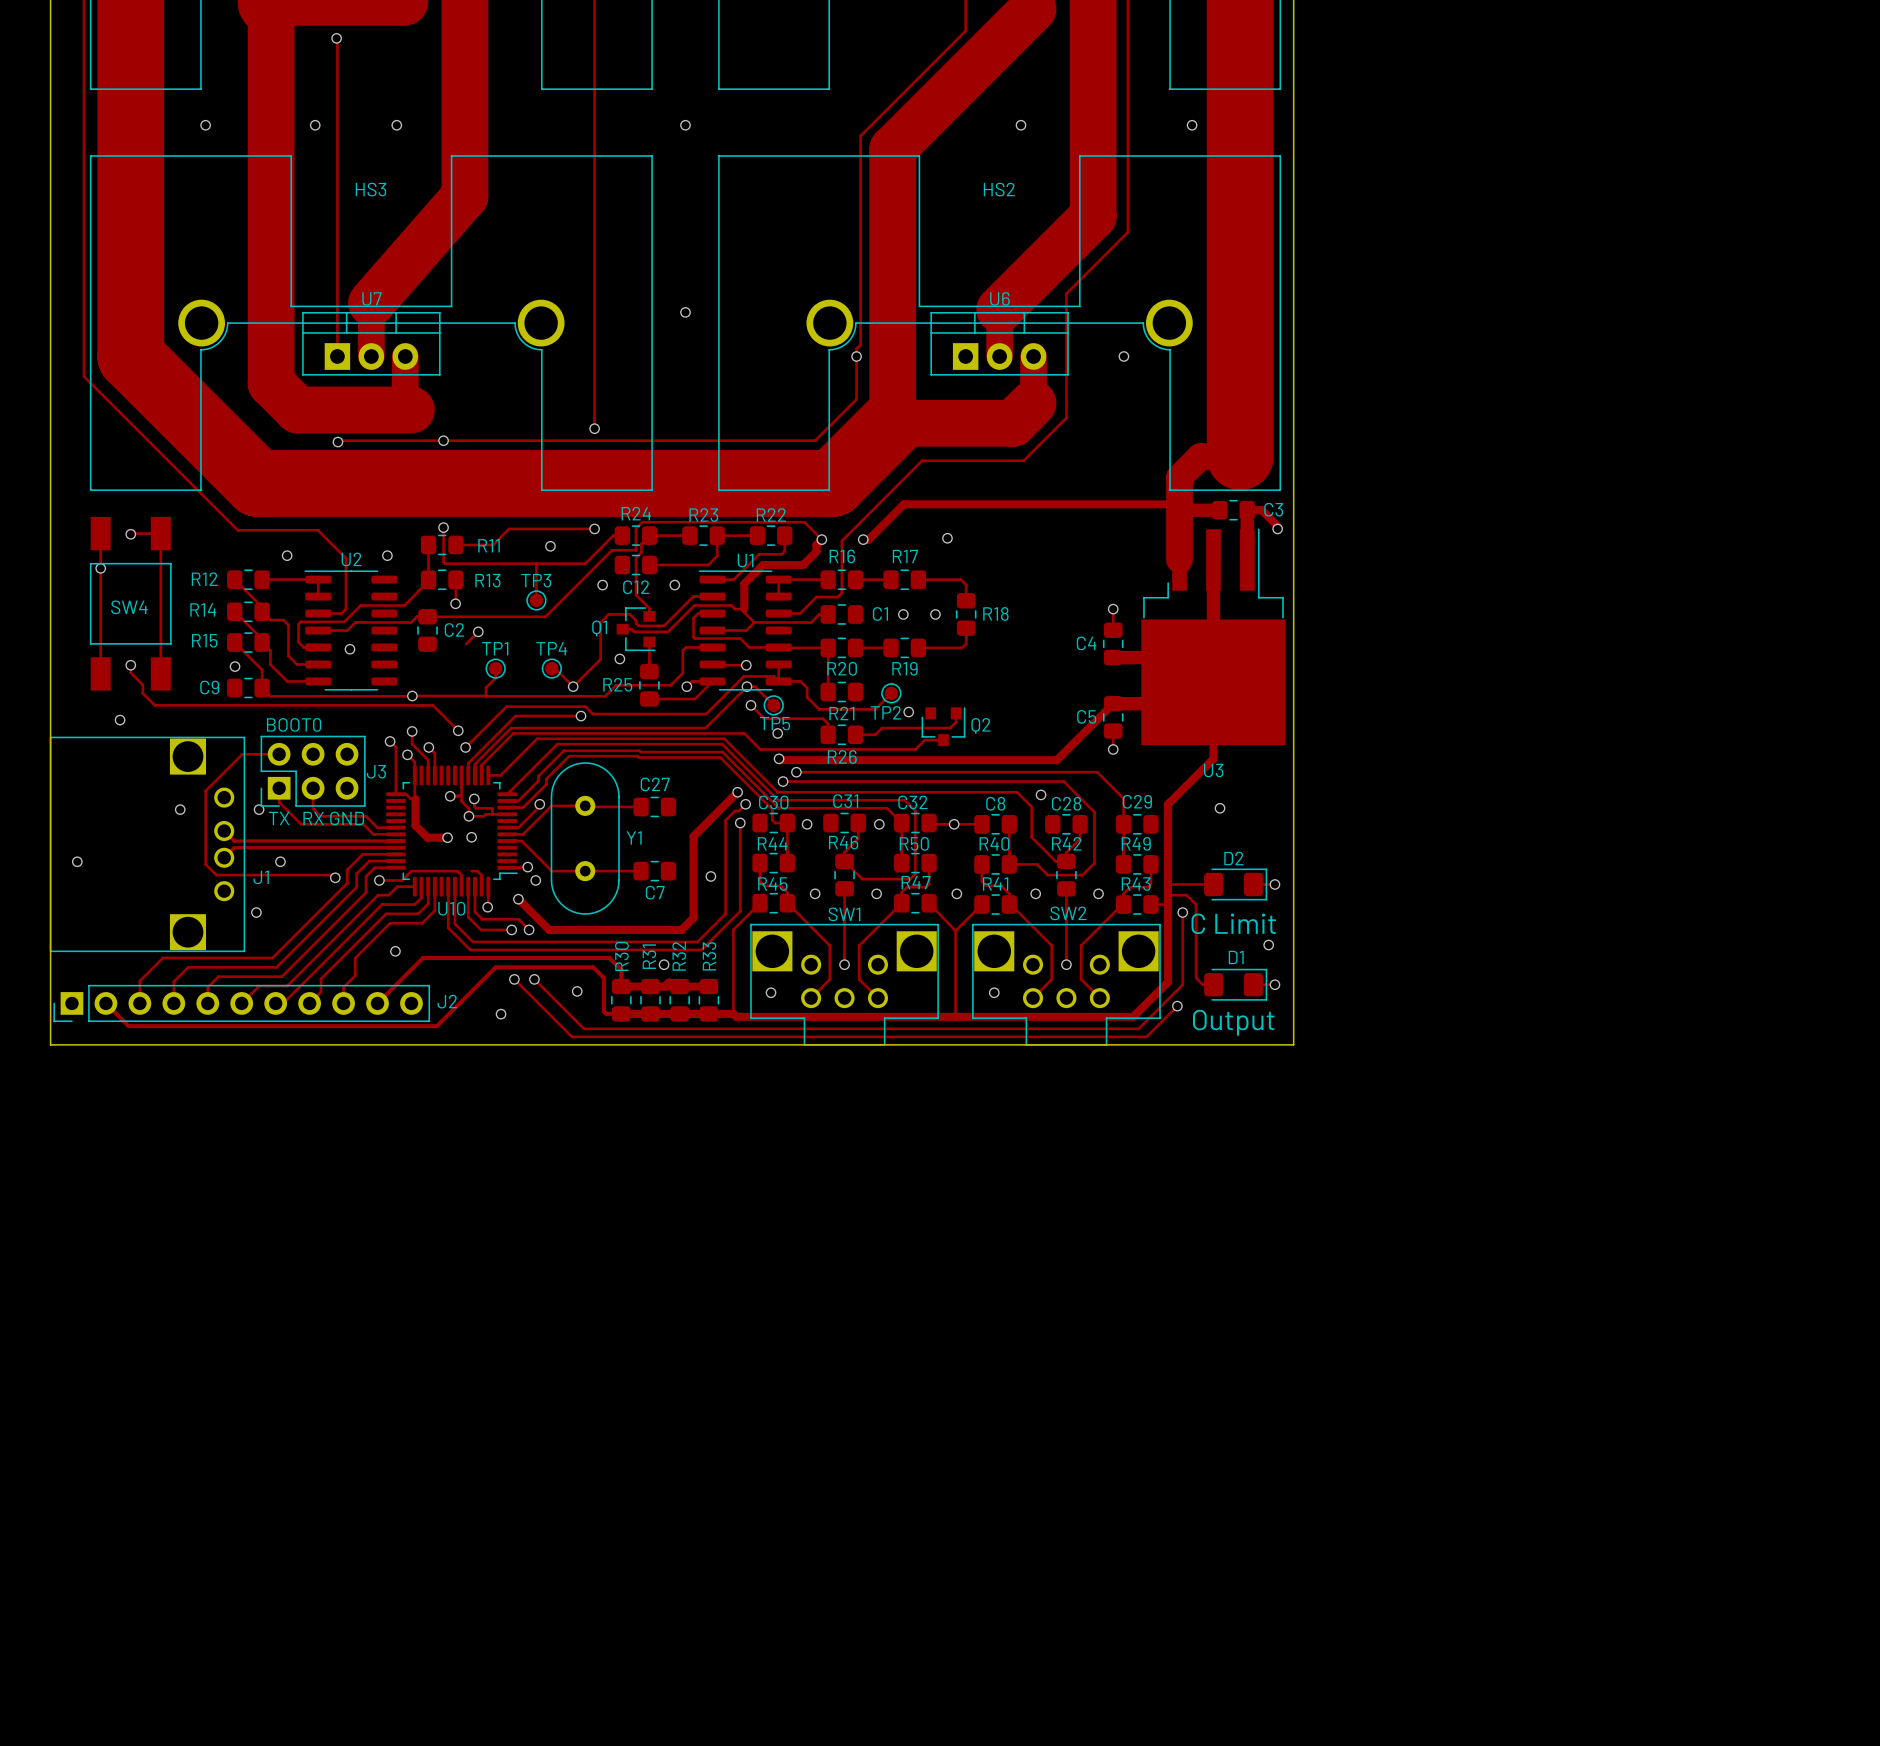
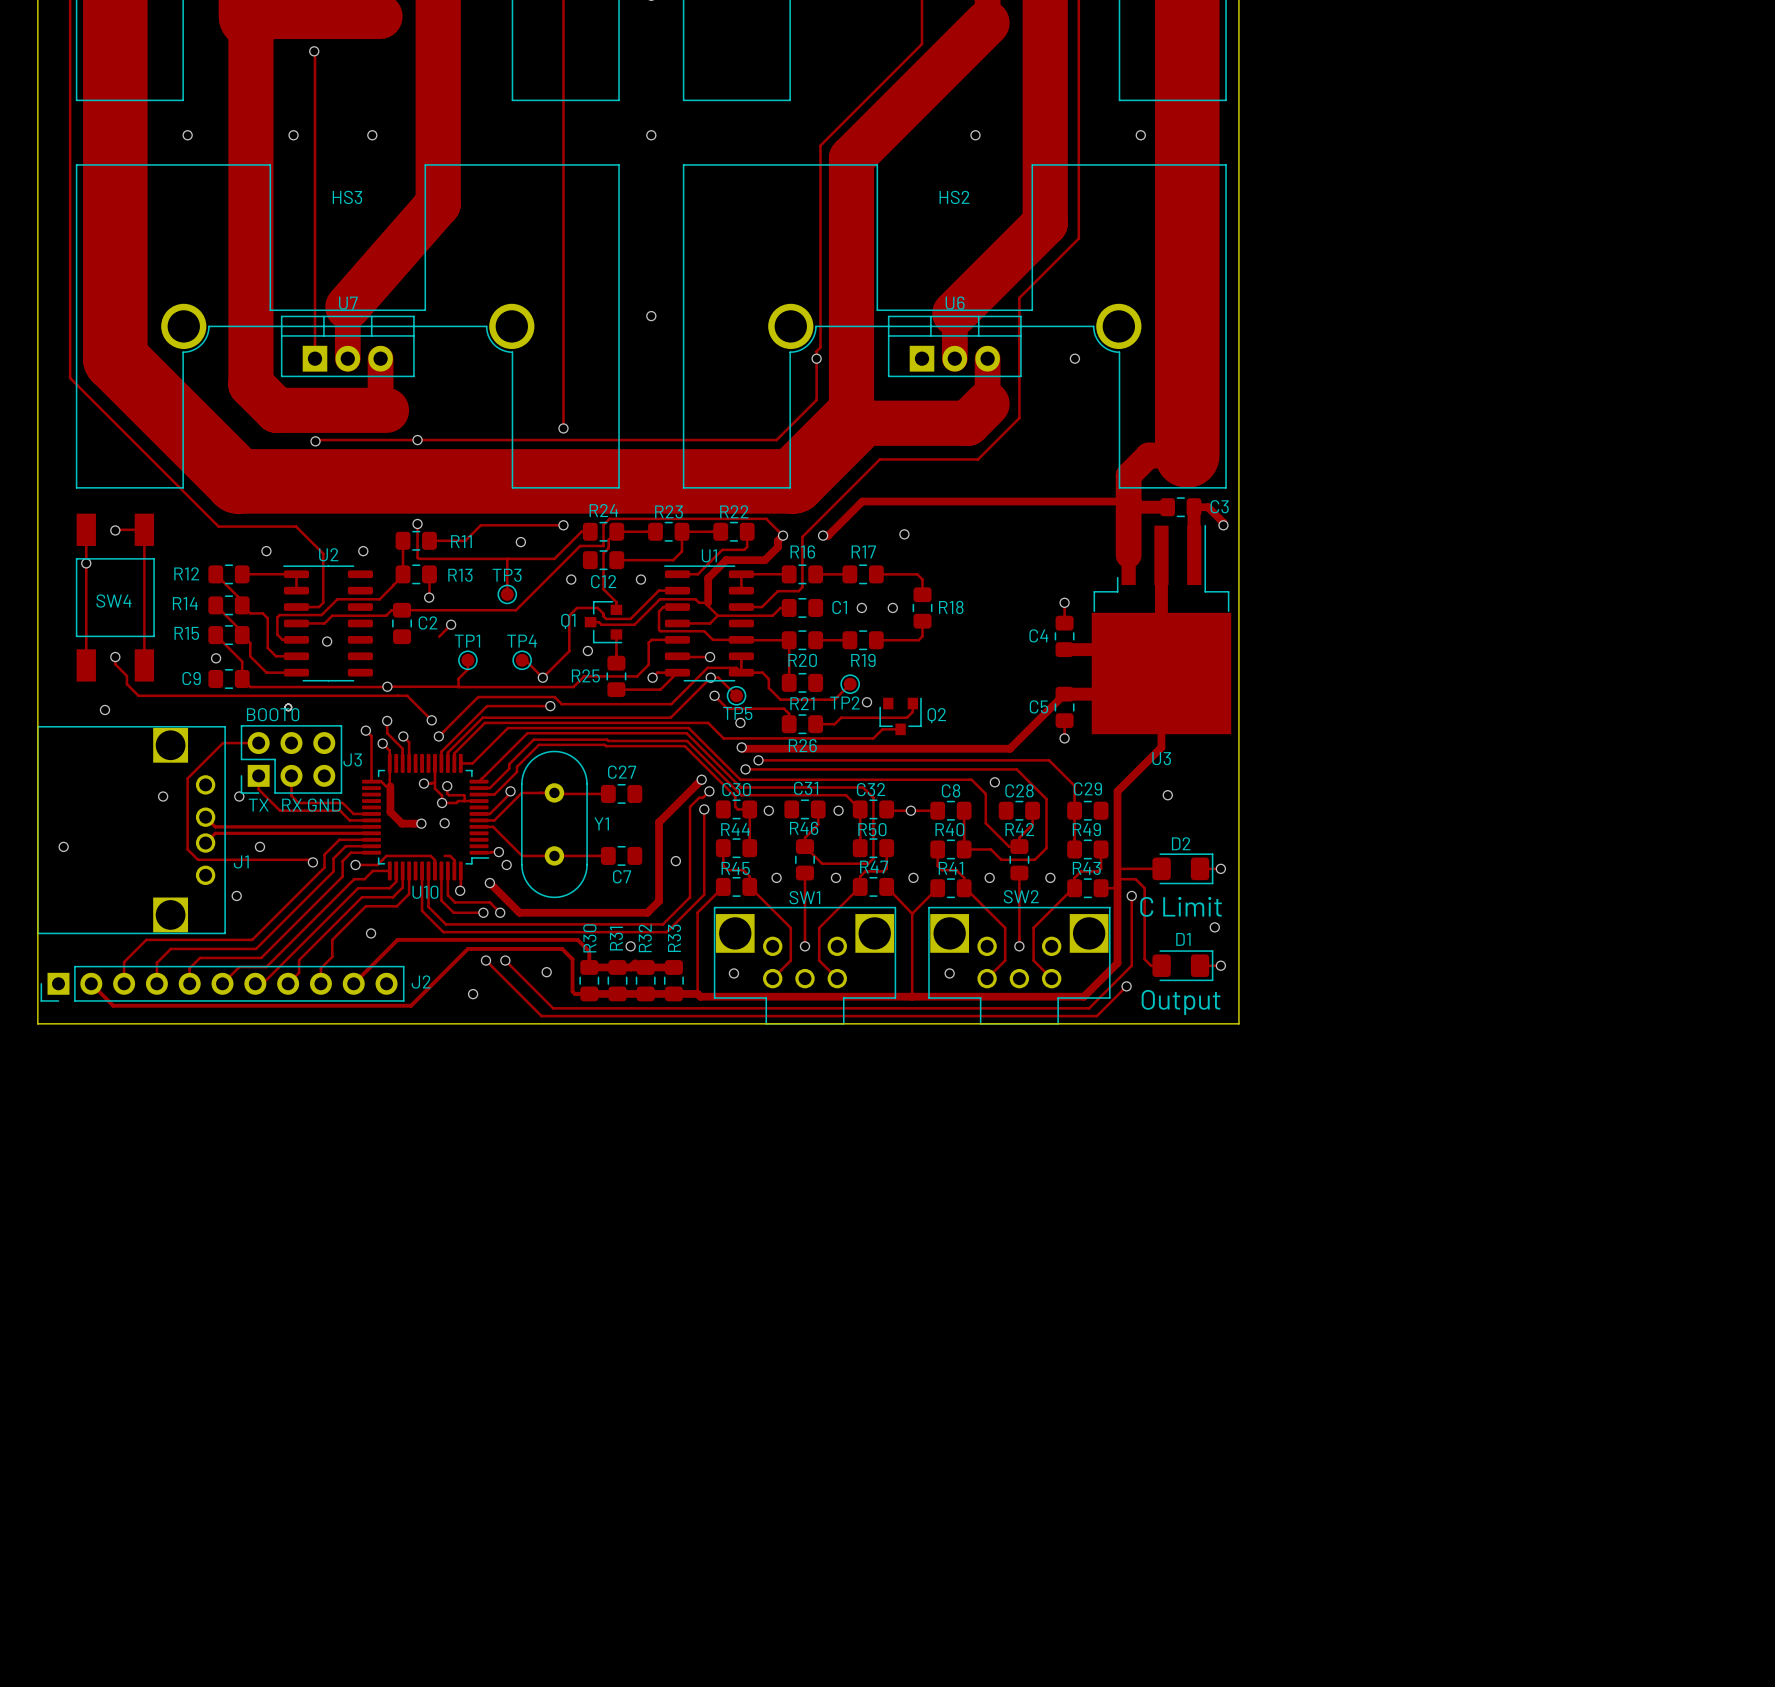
via: none -> (288, 707)

